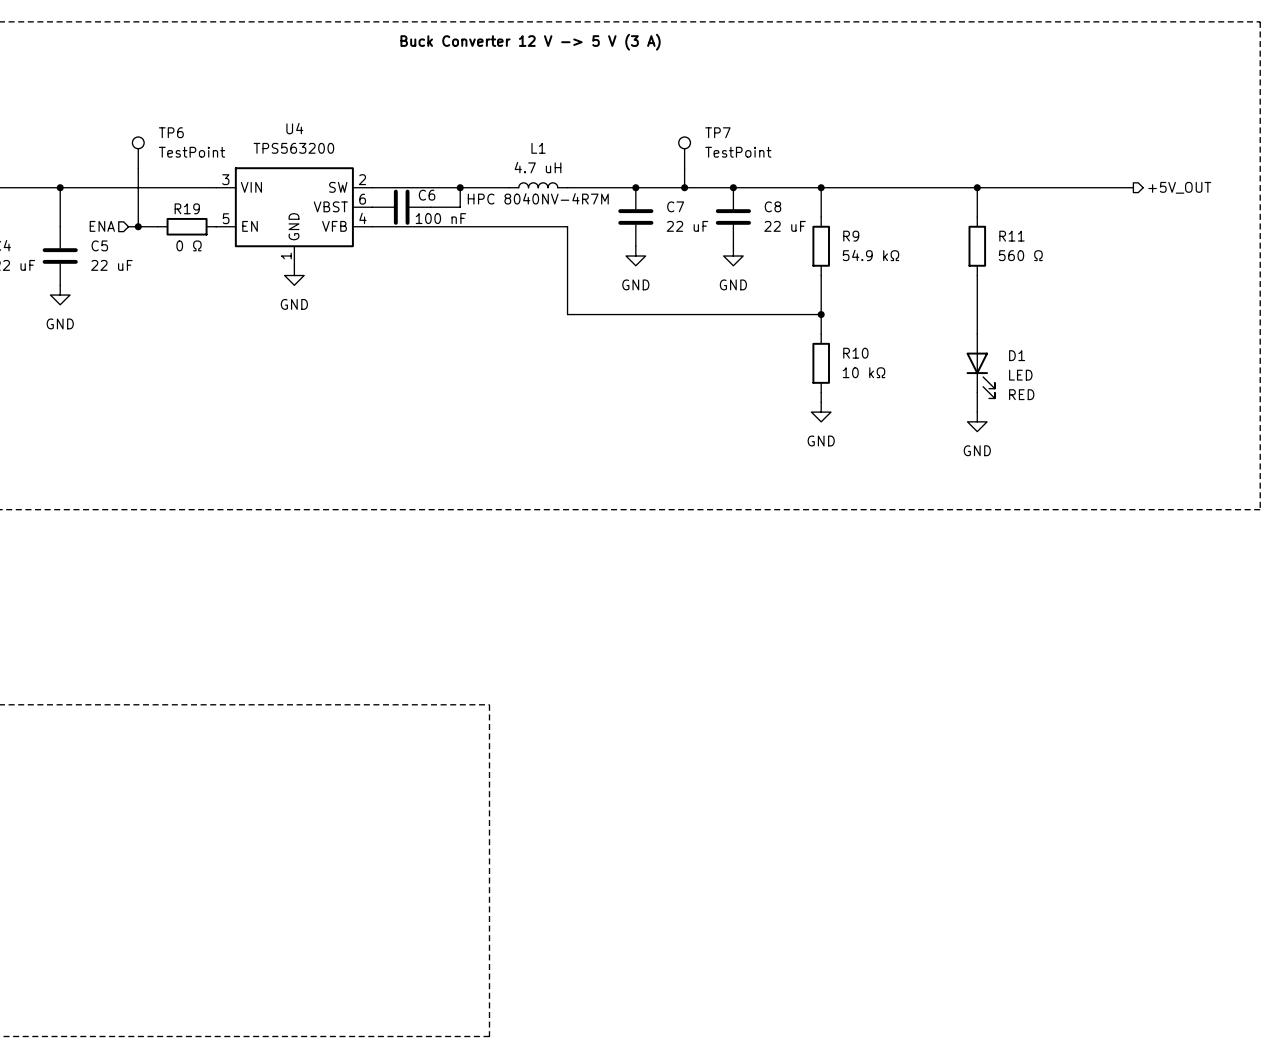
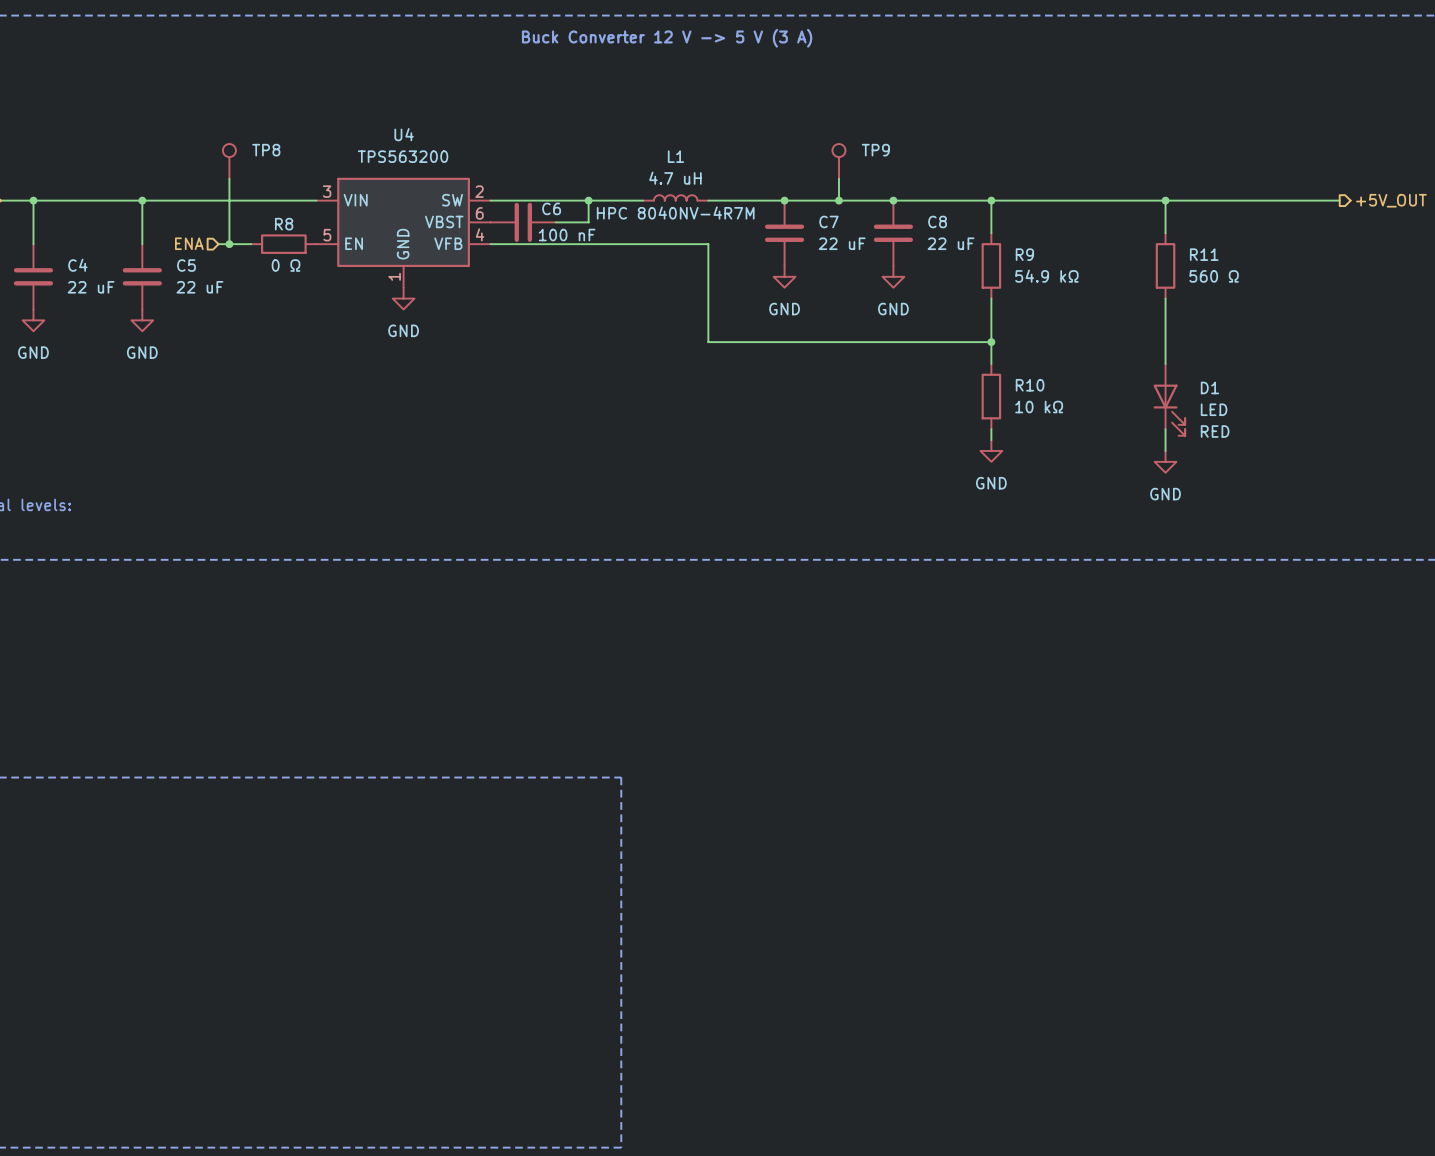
TP6 name: TP6 (171, 132) -> TP8 (266, 150)
TP7 name: TP7 (717, 132) -> TP9 (875, 150)
TP6 value: TestPoint (192, 152) -> none
TP7 value: TestPoint (738, 152) -> none
R19 name: R19 (187, 208) -> R8 (284, 224)

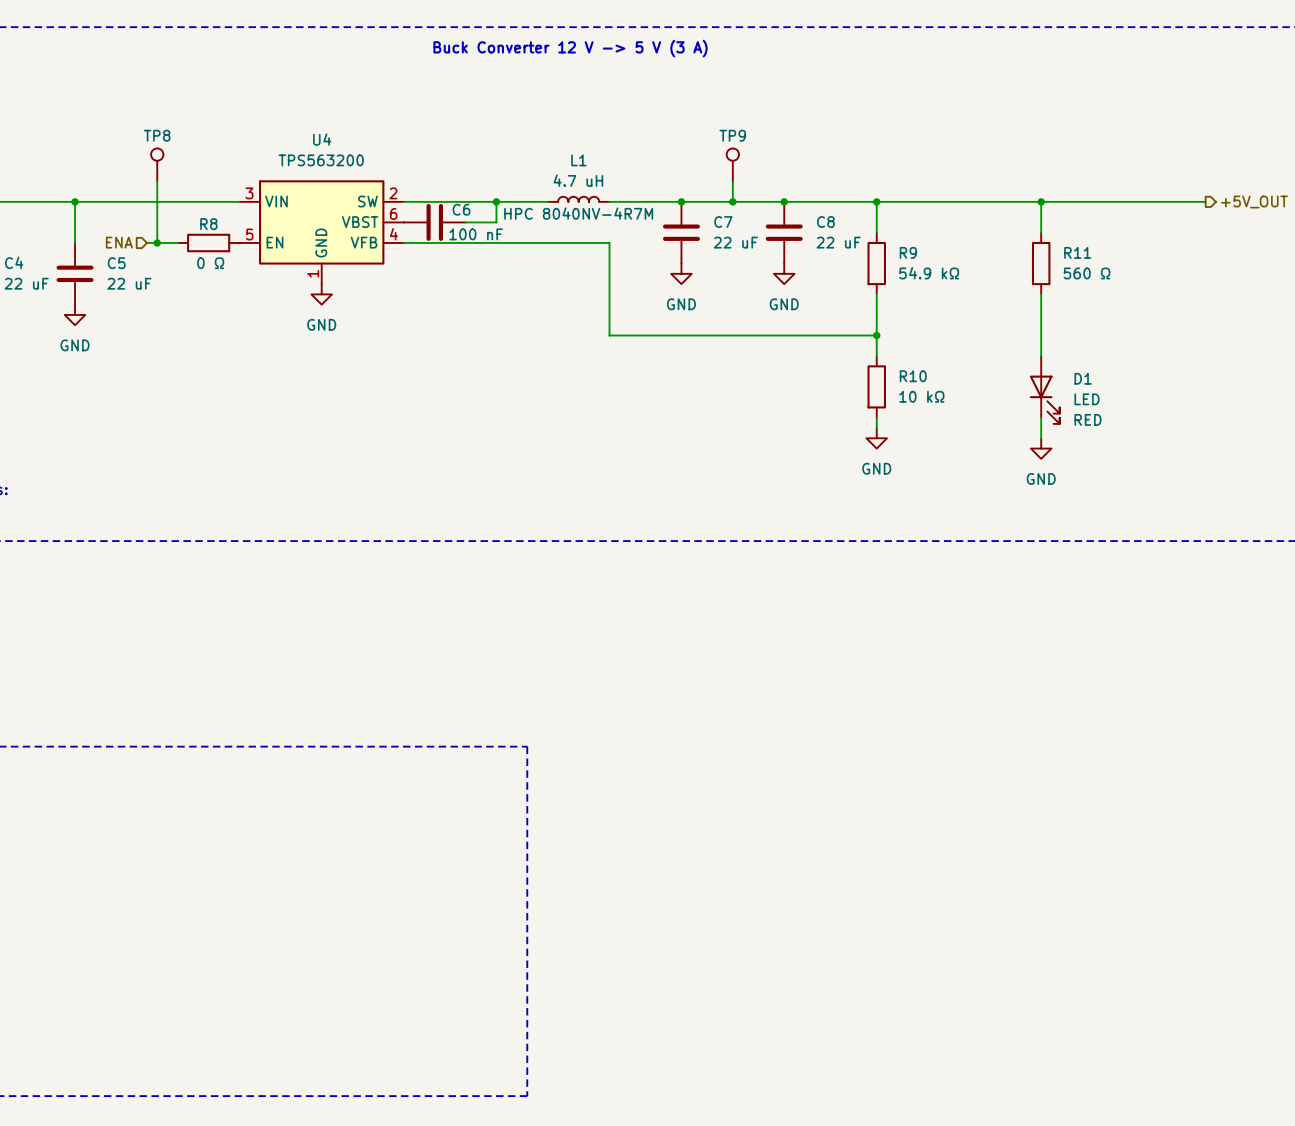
TP8 name position: TP8 (266, 150) -> TP8 (157, 135)
TP9 name position: TP9 (875, 150) -> TP9 (732, 135)

